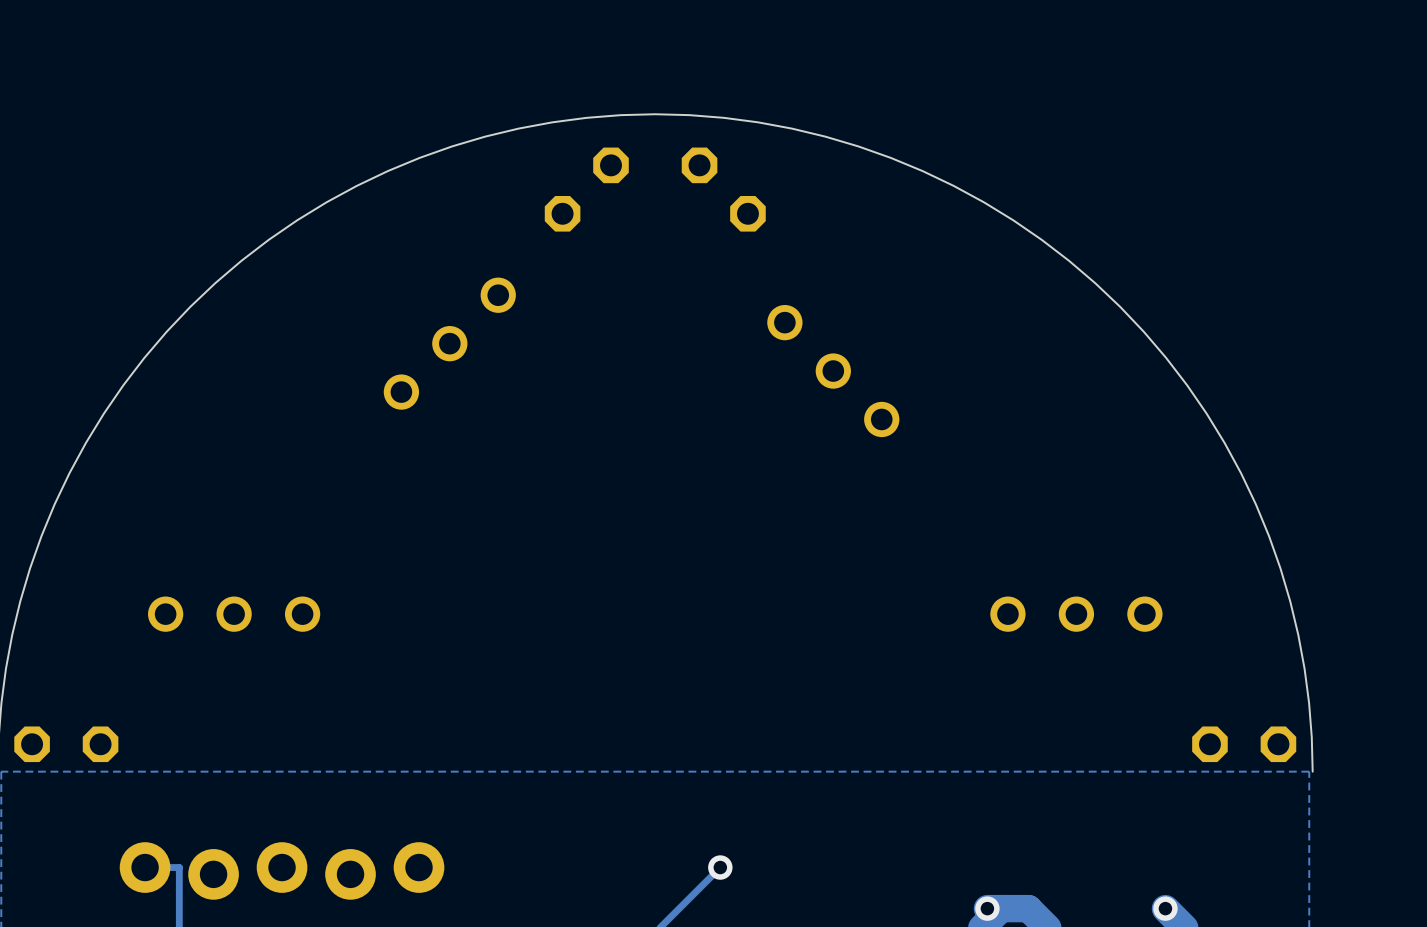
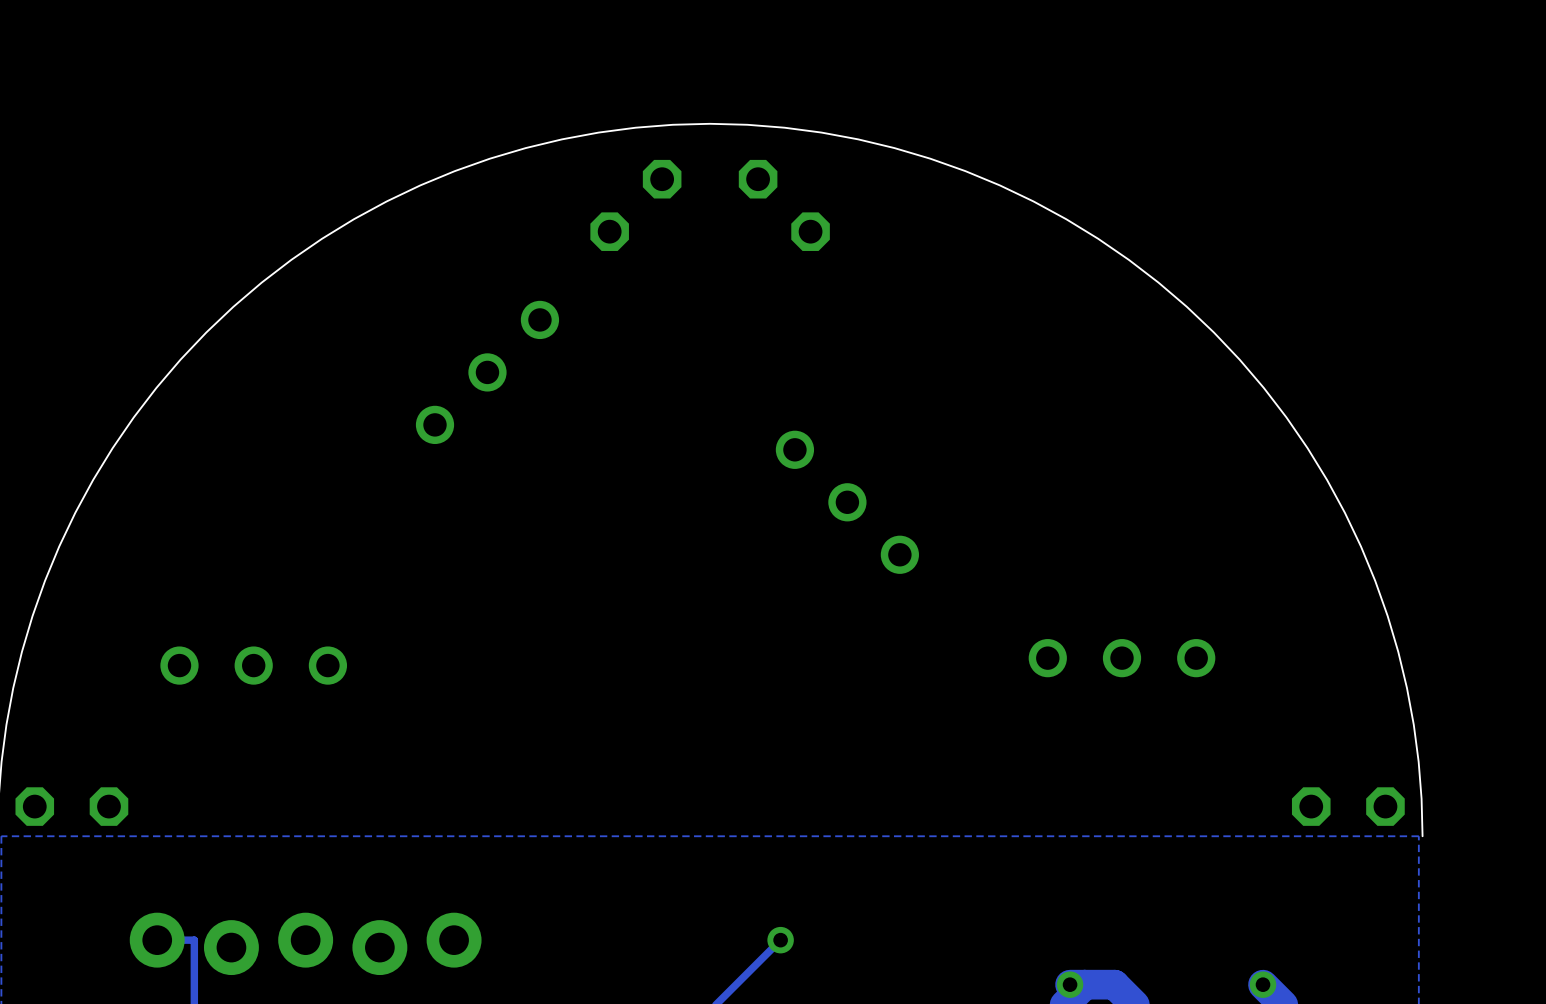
part position: (833, 371) -> (847, 502)
part position: (1076, 614) -> (1122, 658)

